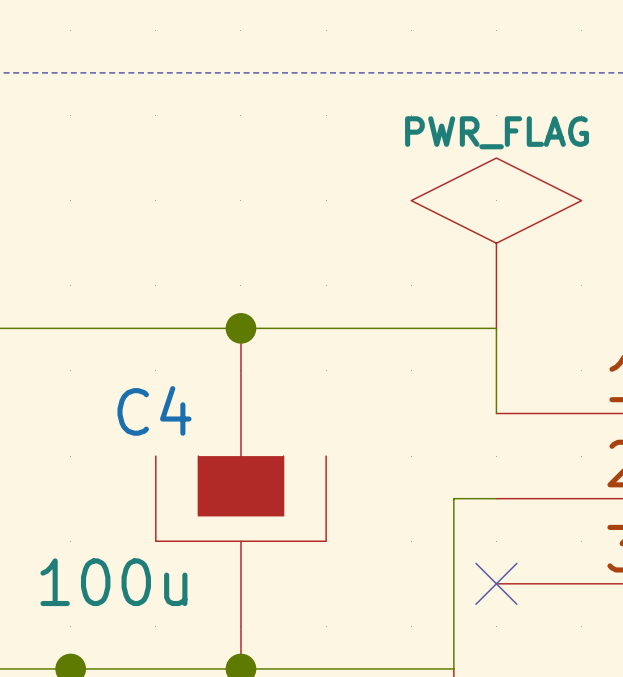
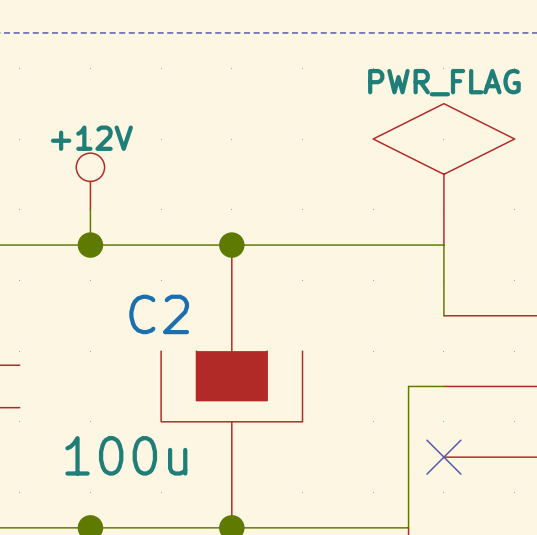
power symbol: none -> +12V (90, 181)
wire: none -> (90, 209) (90, 245)
junction: none -> (90, 245)
C4 name: C4 (154, 410) -> C2 (159, 314)

